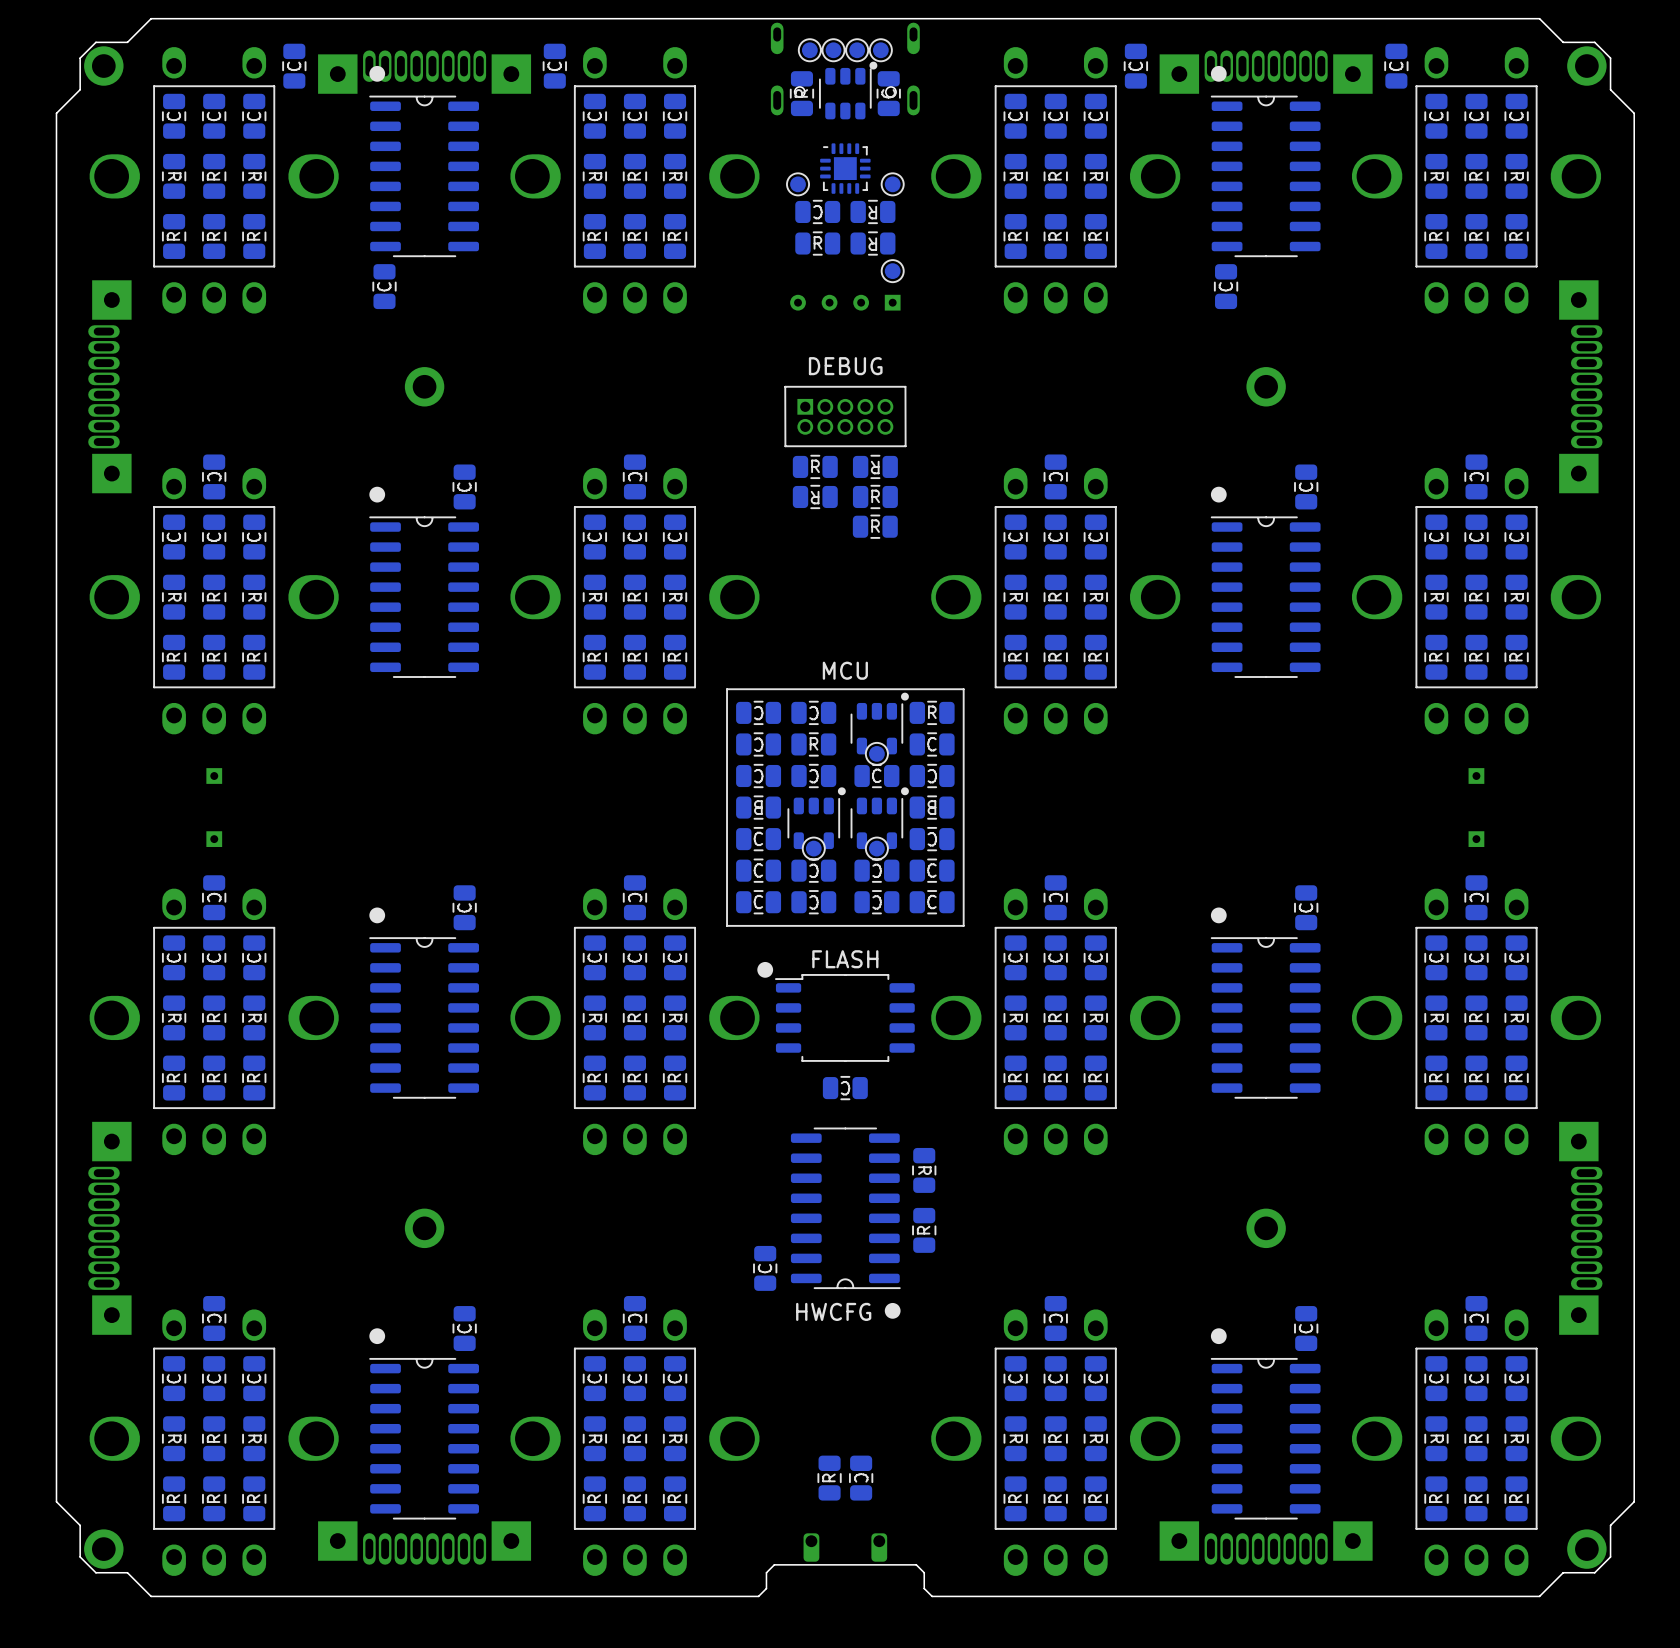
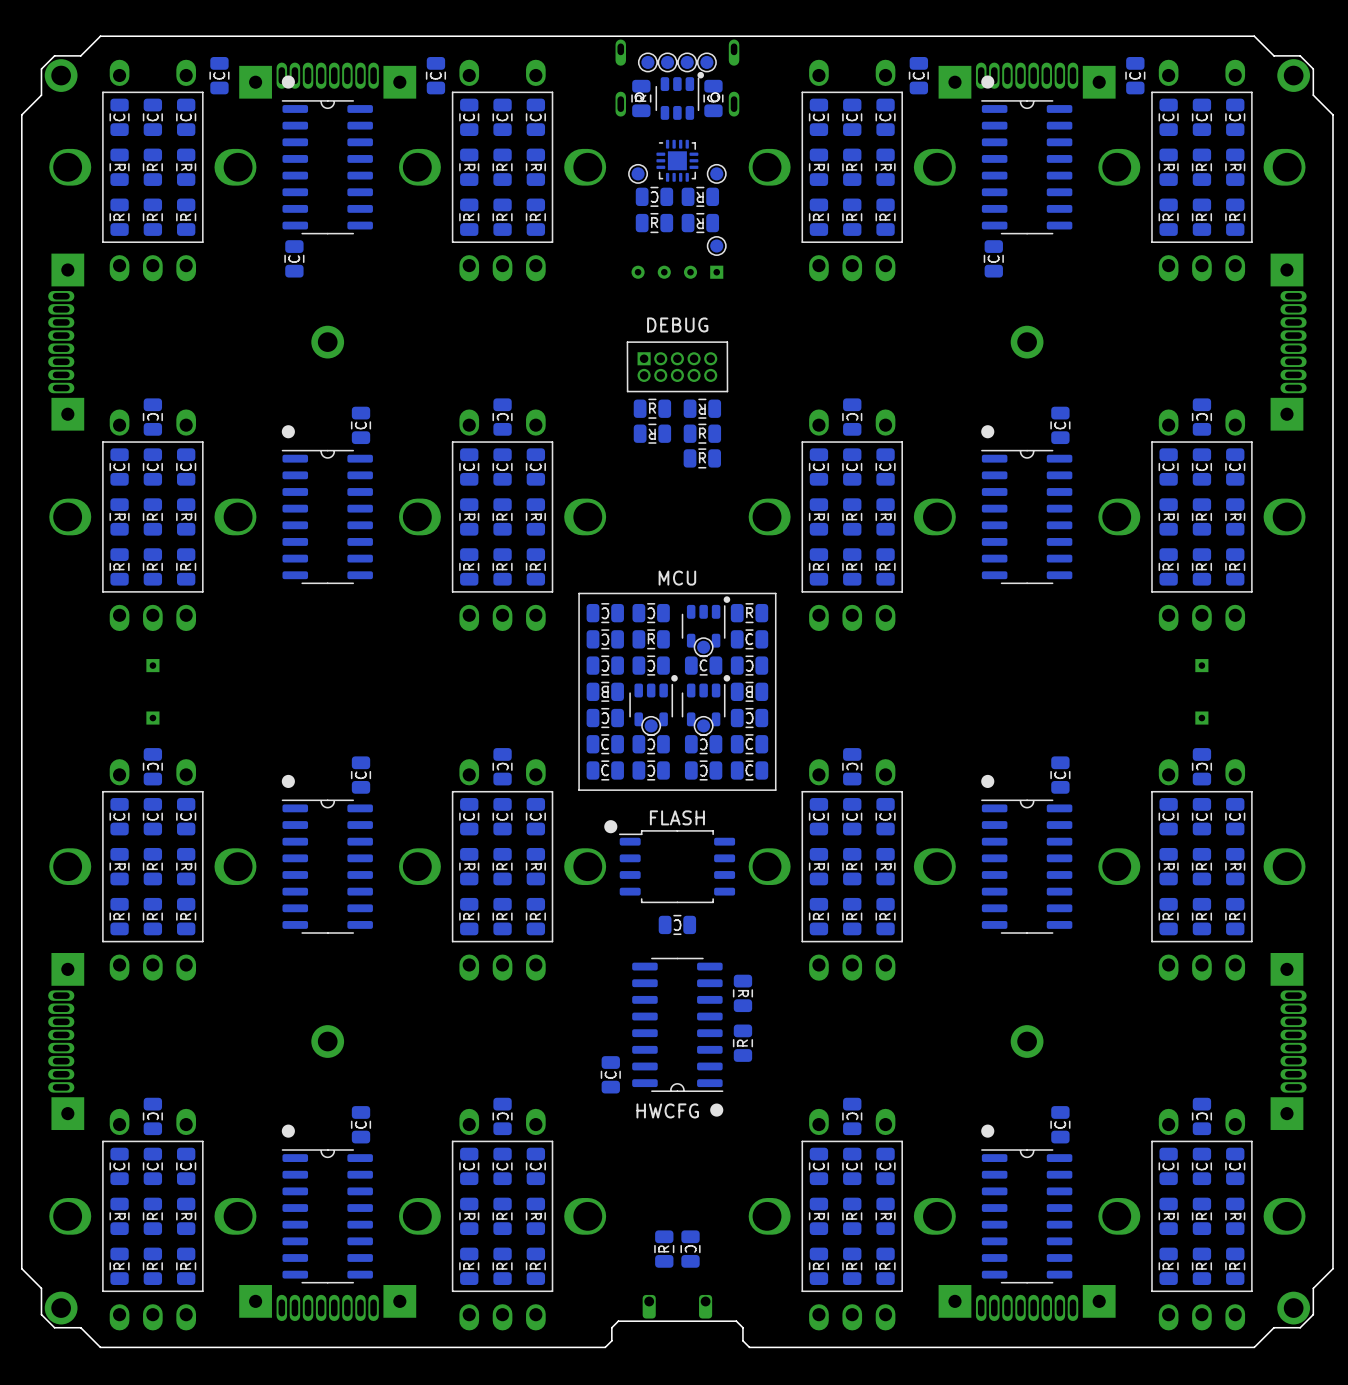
part rotation: 0° (758, 839) -> 180° (605, 718)

